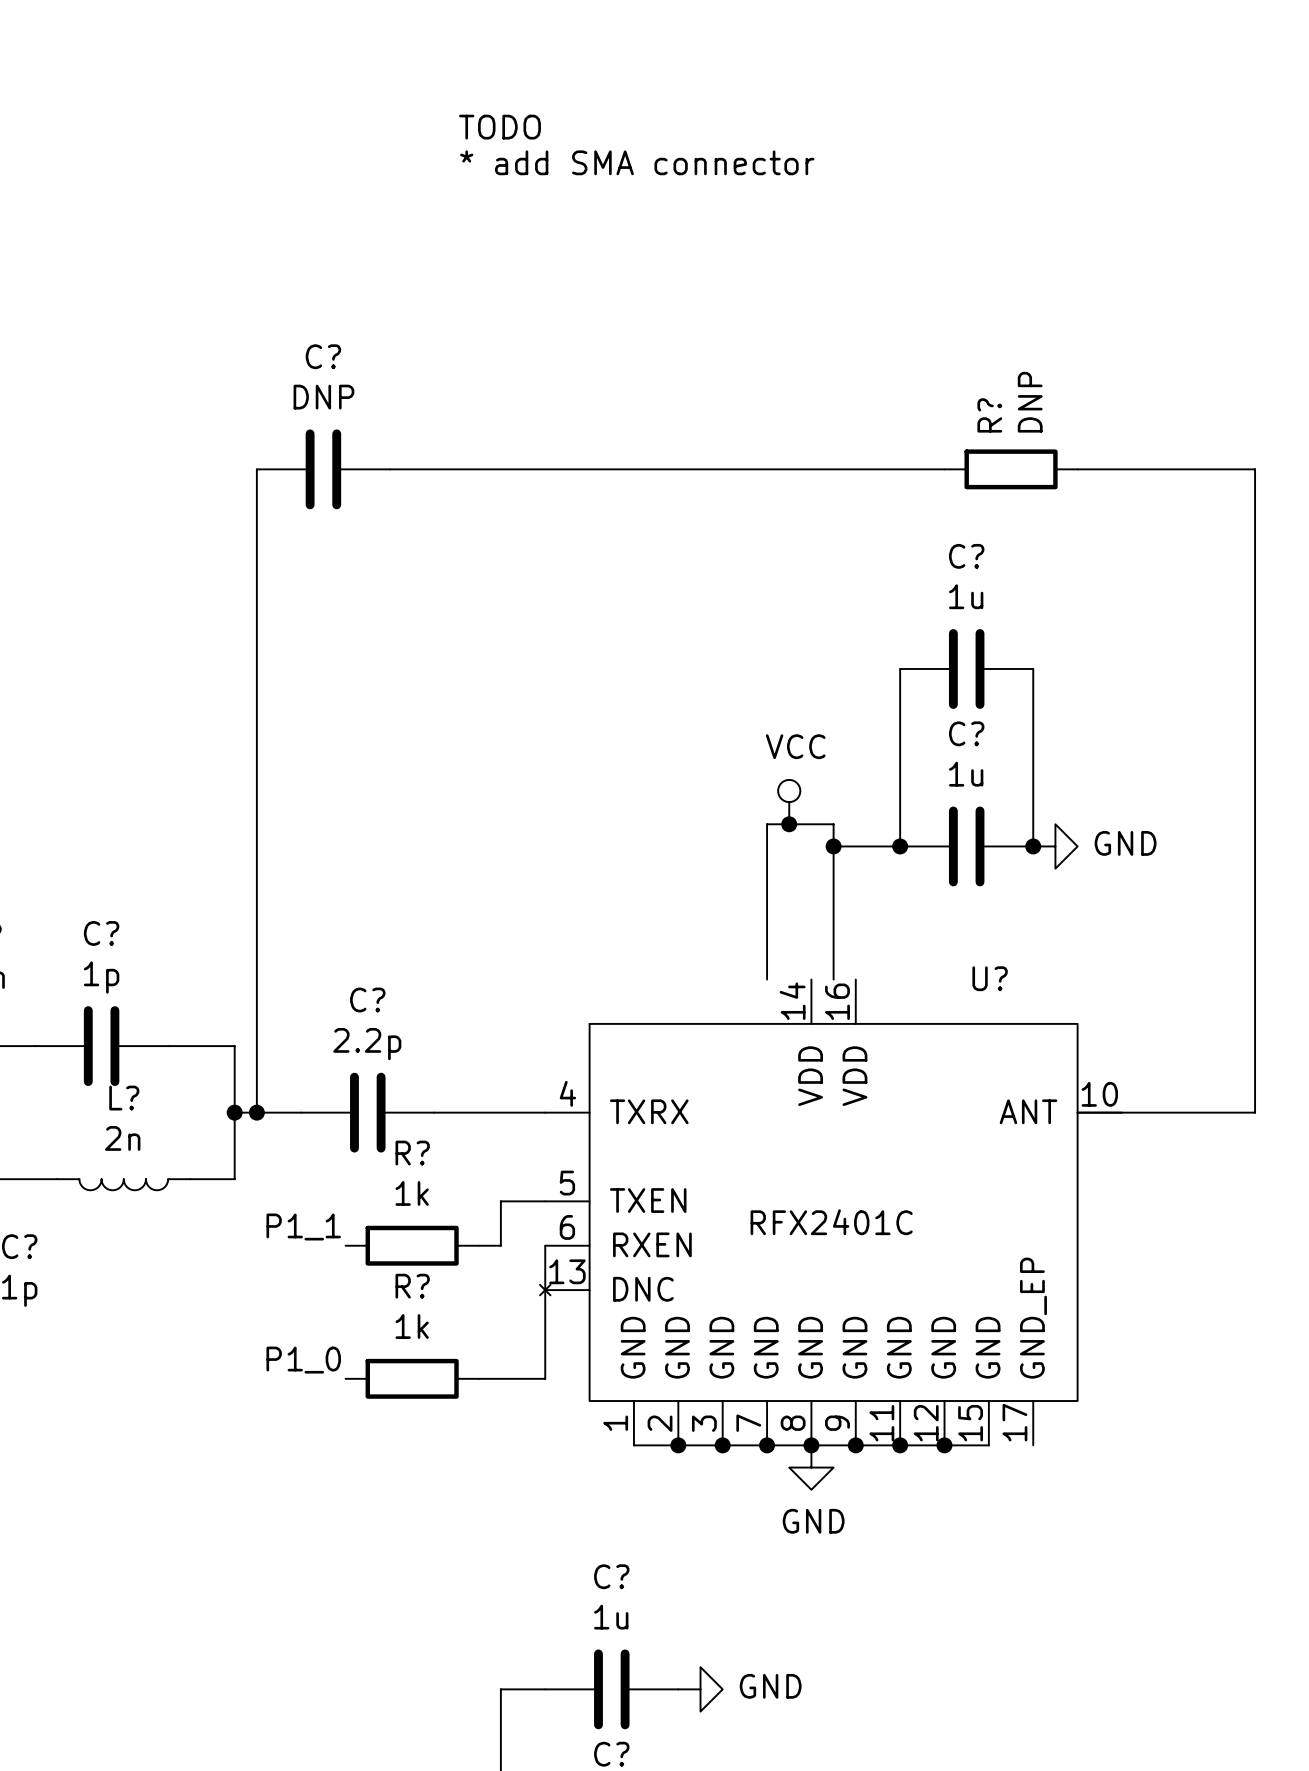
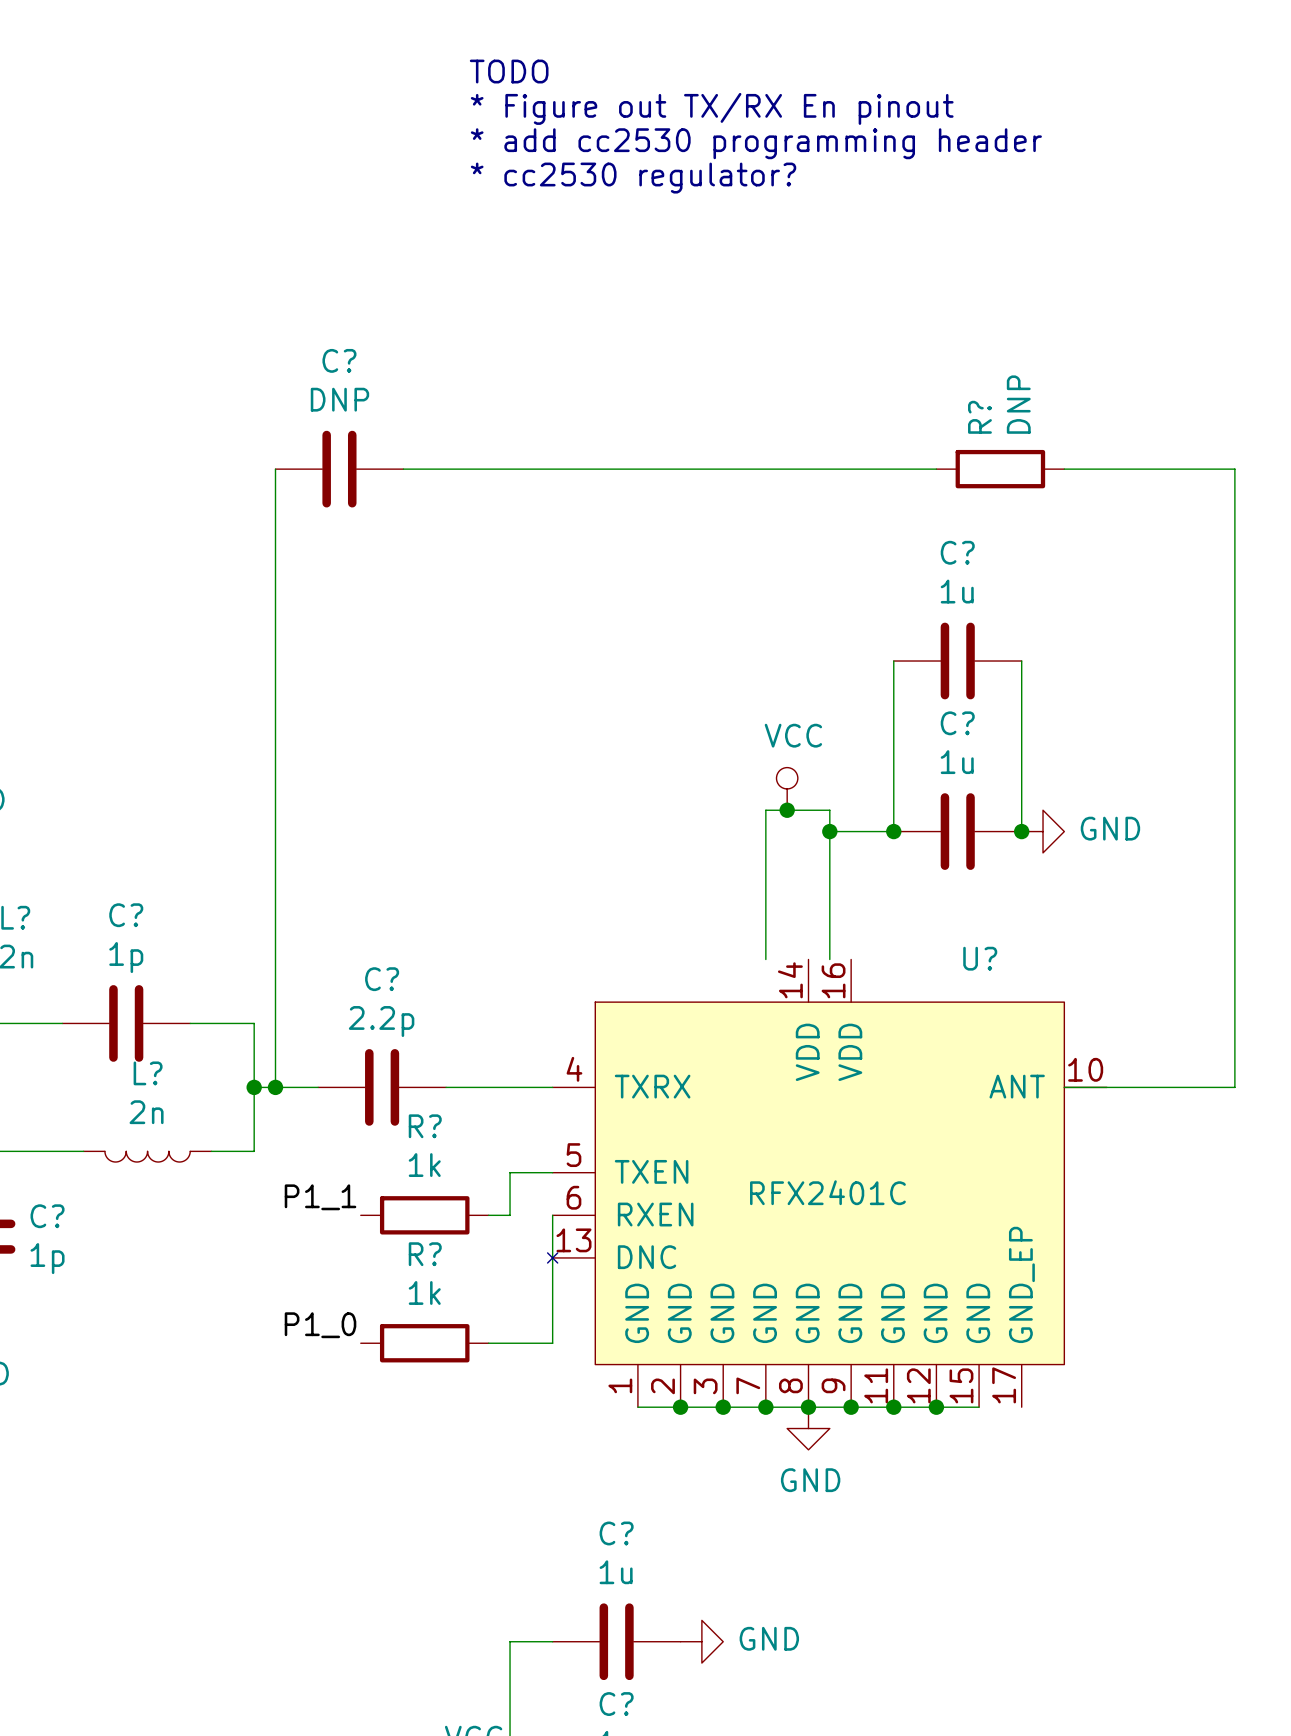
text: none -> TODO (509, 71)
text: none -> * Figure out TX/RX En pinout (712, 108)
text: TODO (499, 127) -> * add cc2530 programming header (756, 143)
text: * add SMA connector (637, 162) -> * cc2530 regulator? (633, 178)

